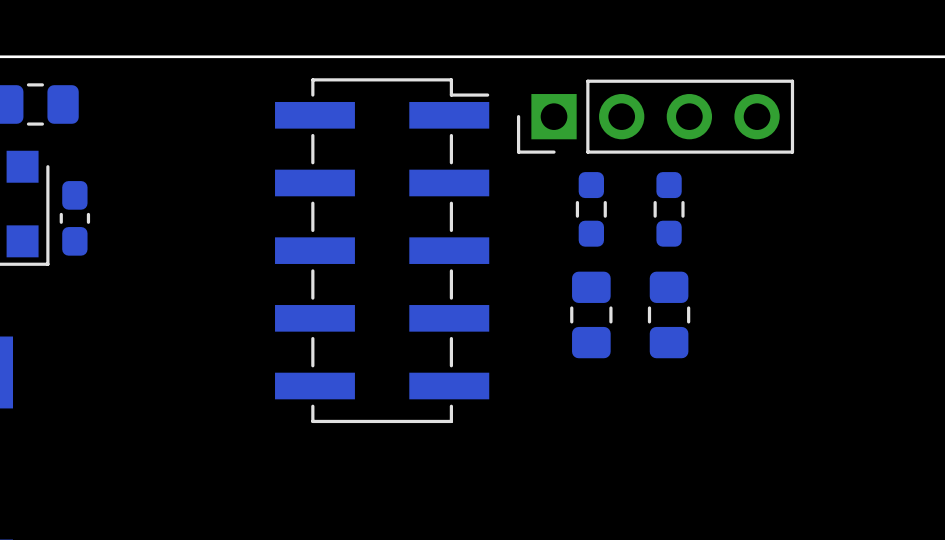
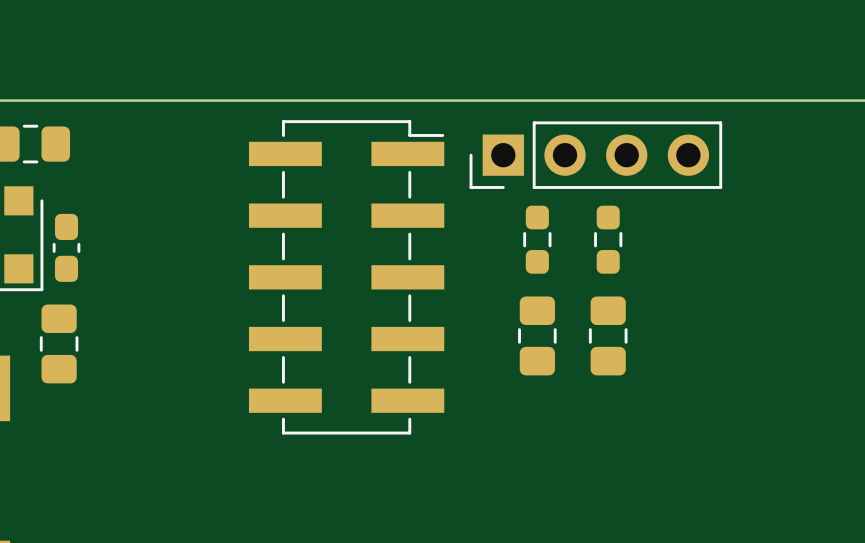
part: none -> (59, 343)

